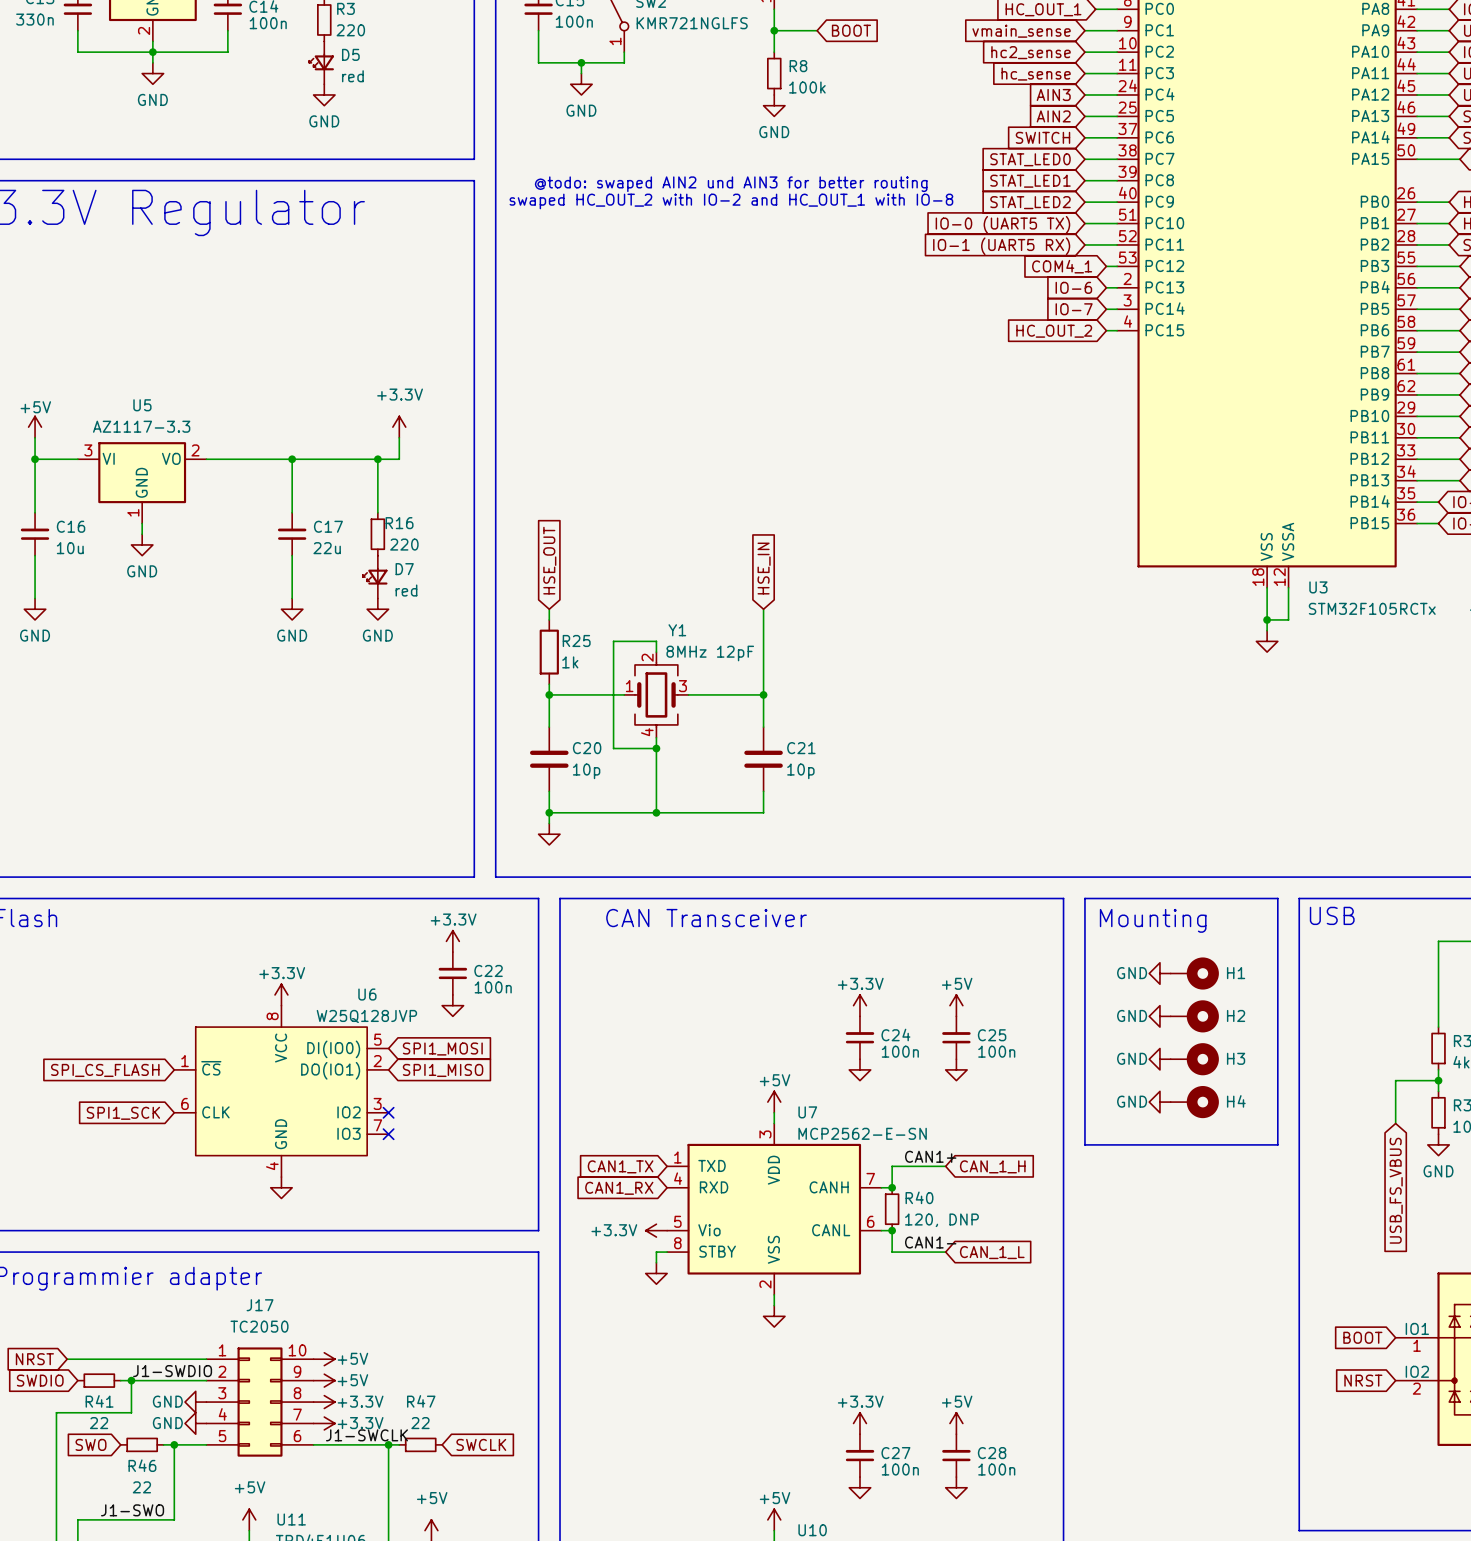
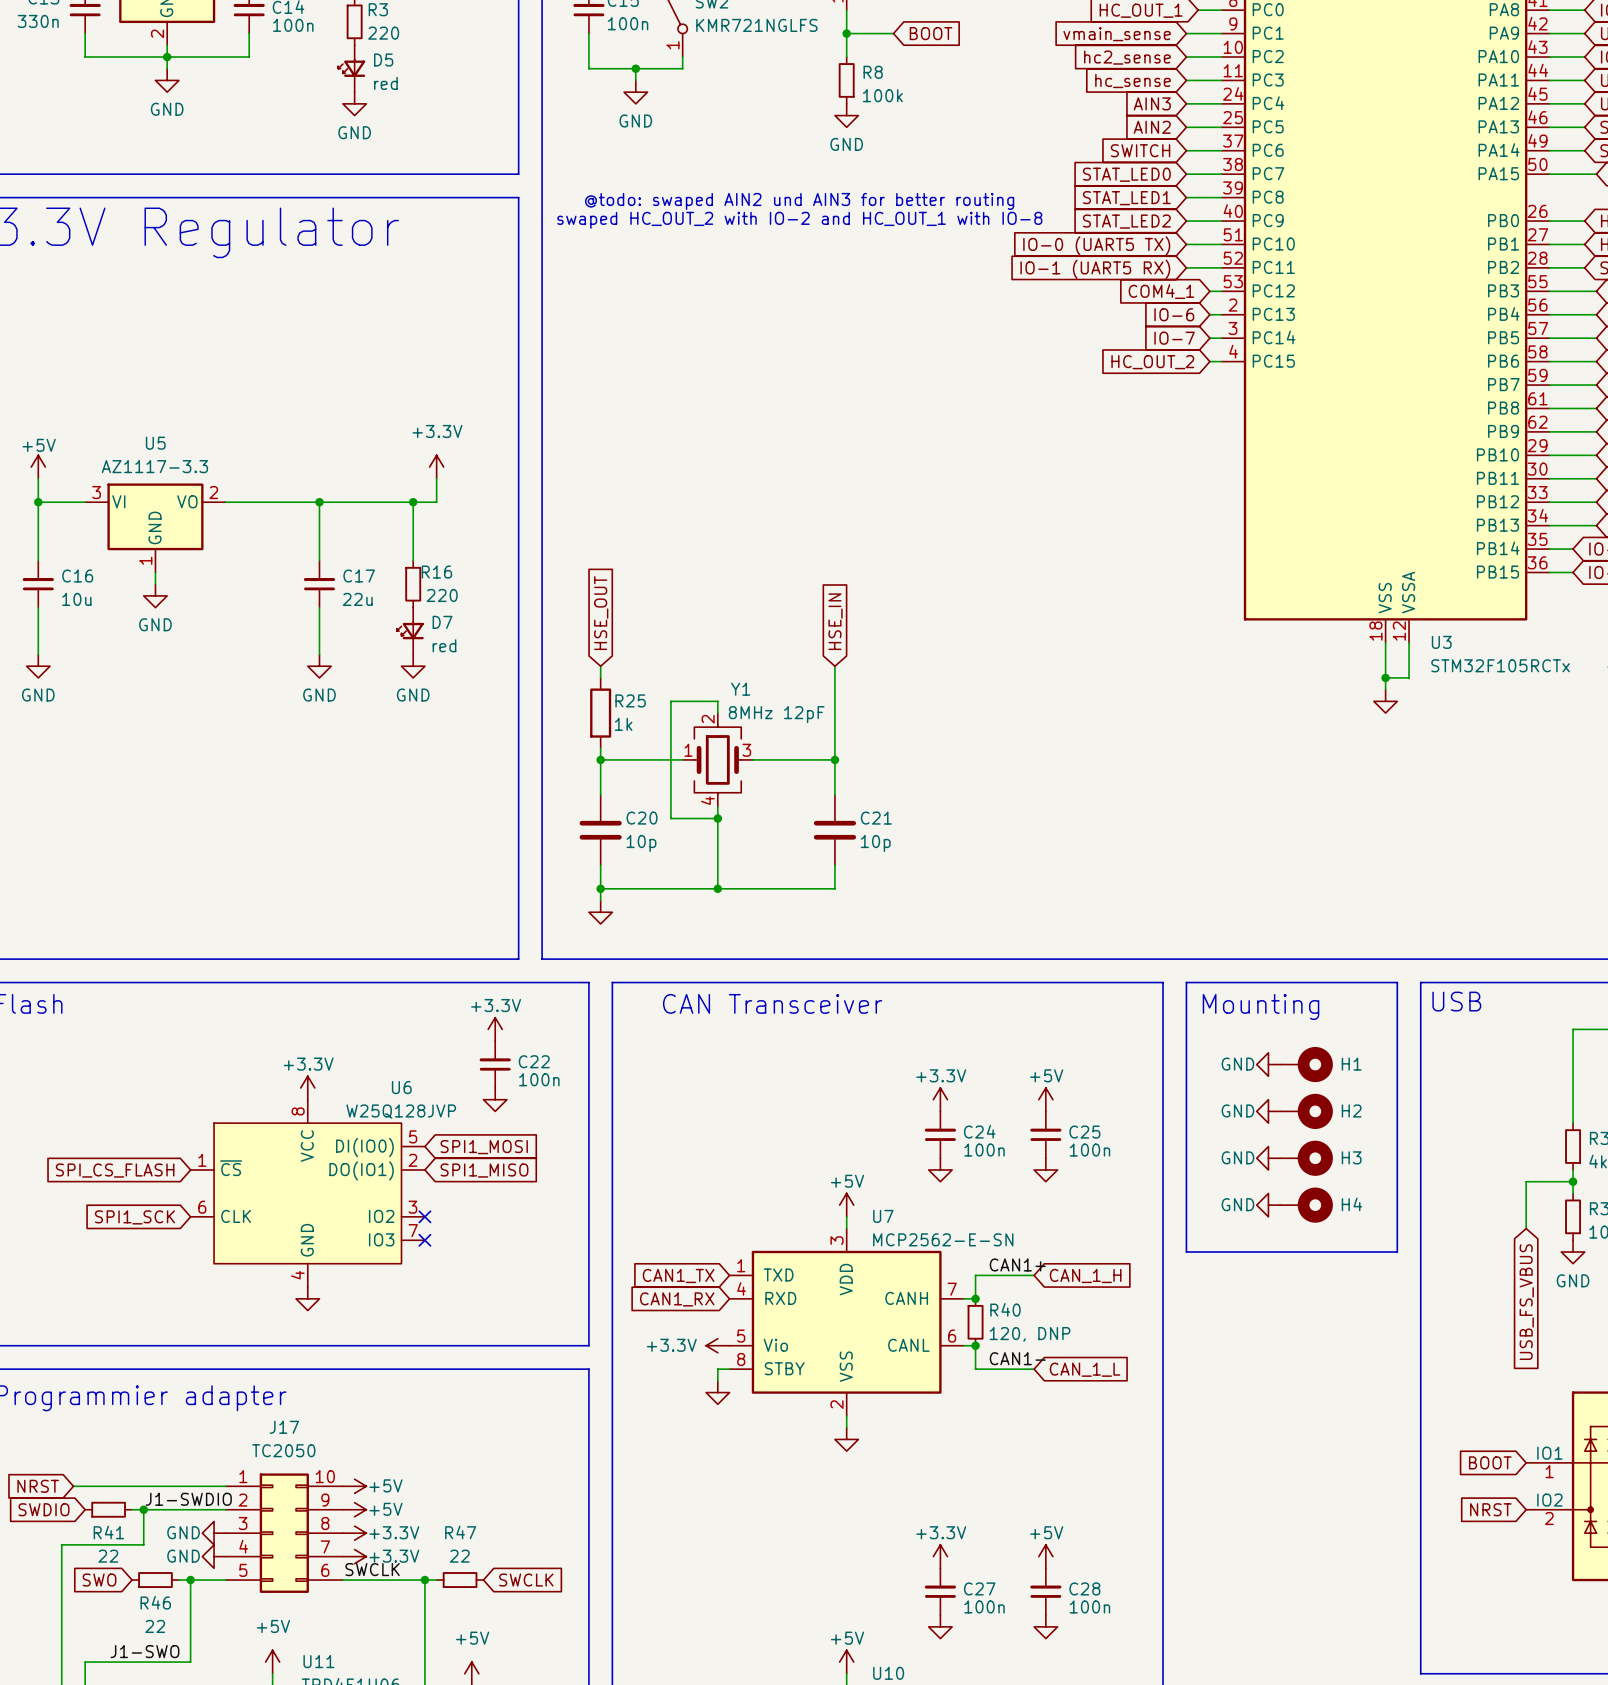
label: J1-SWCLK (366, 1435) -> SWCLK (372, 1569)

